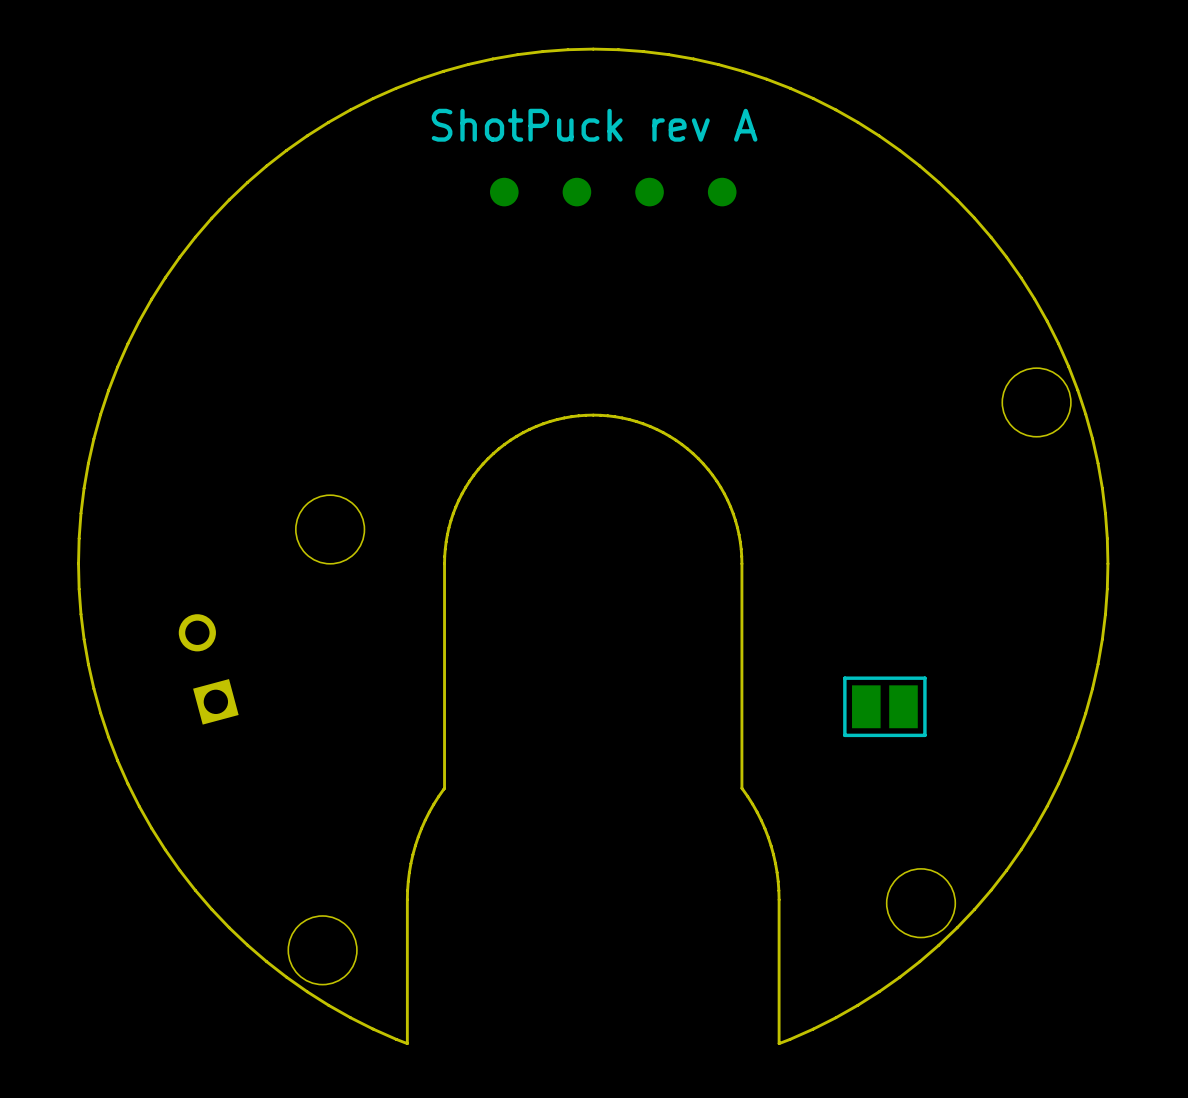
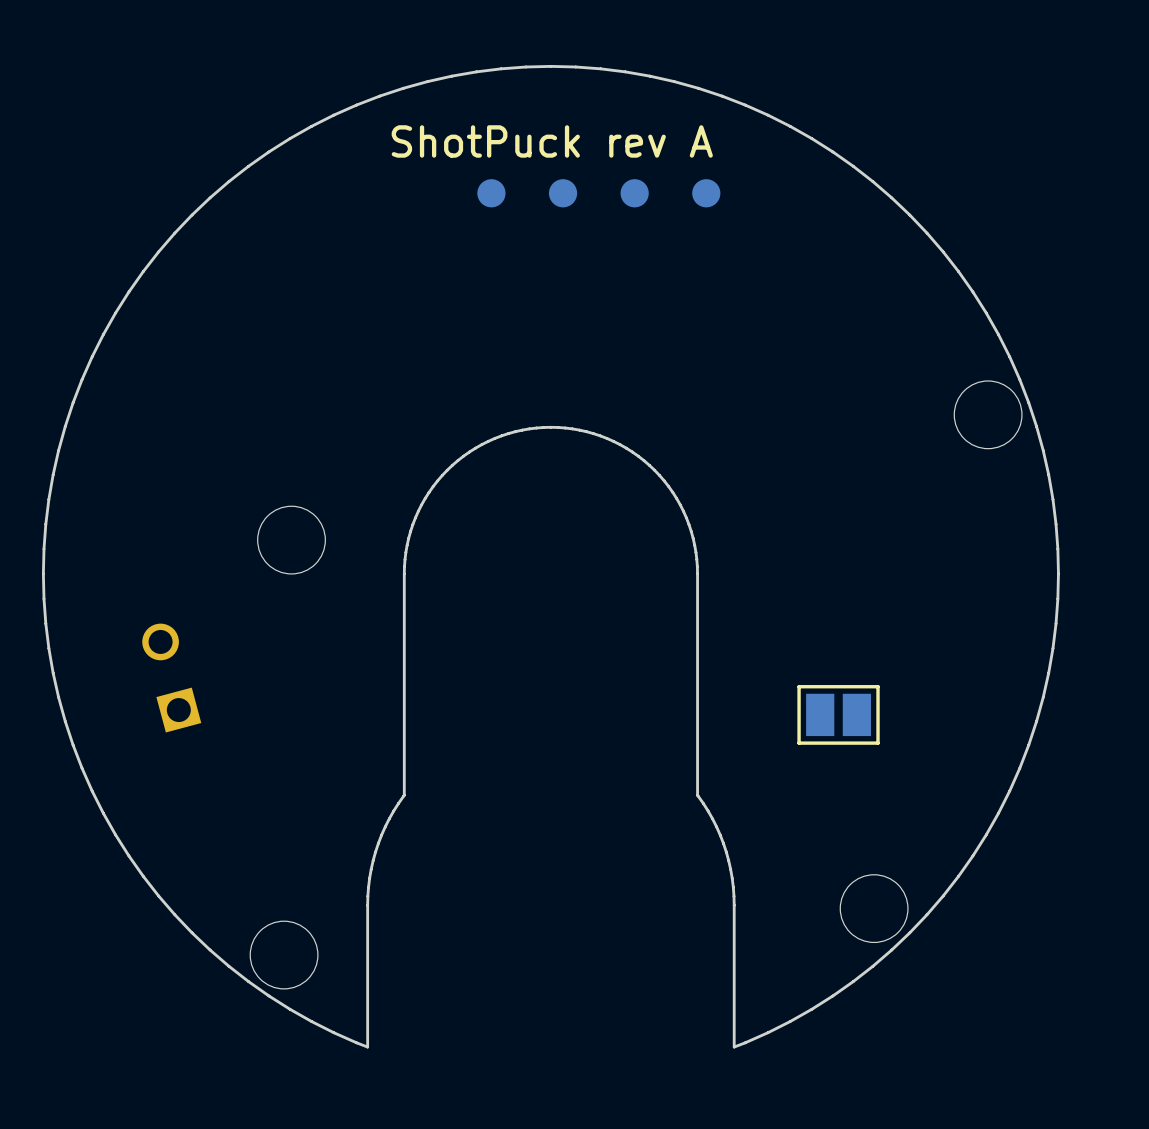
part position: (613, 192) -> (598, 193)

